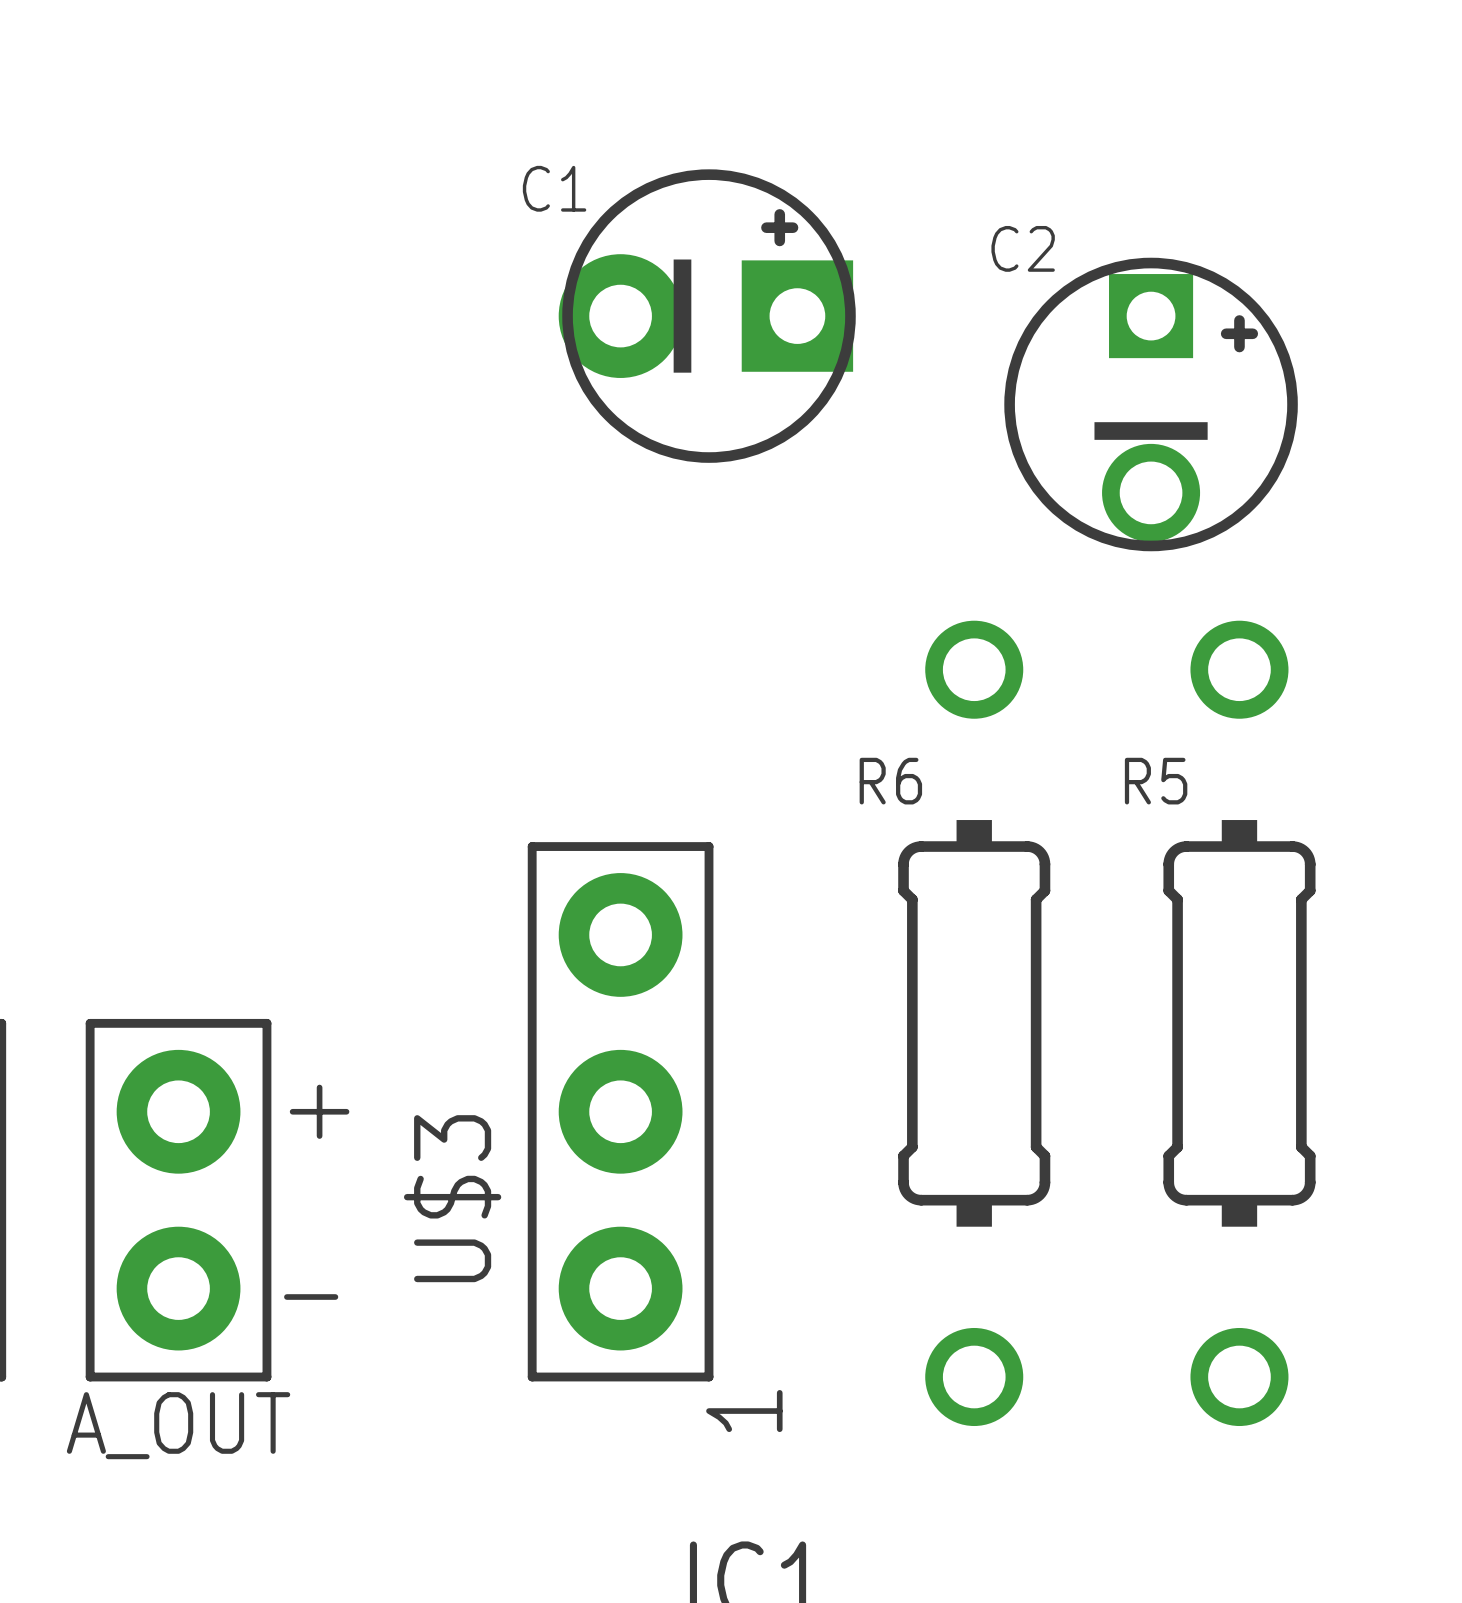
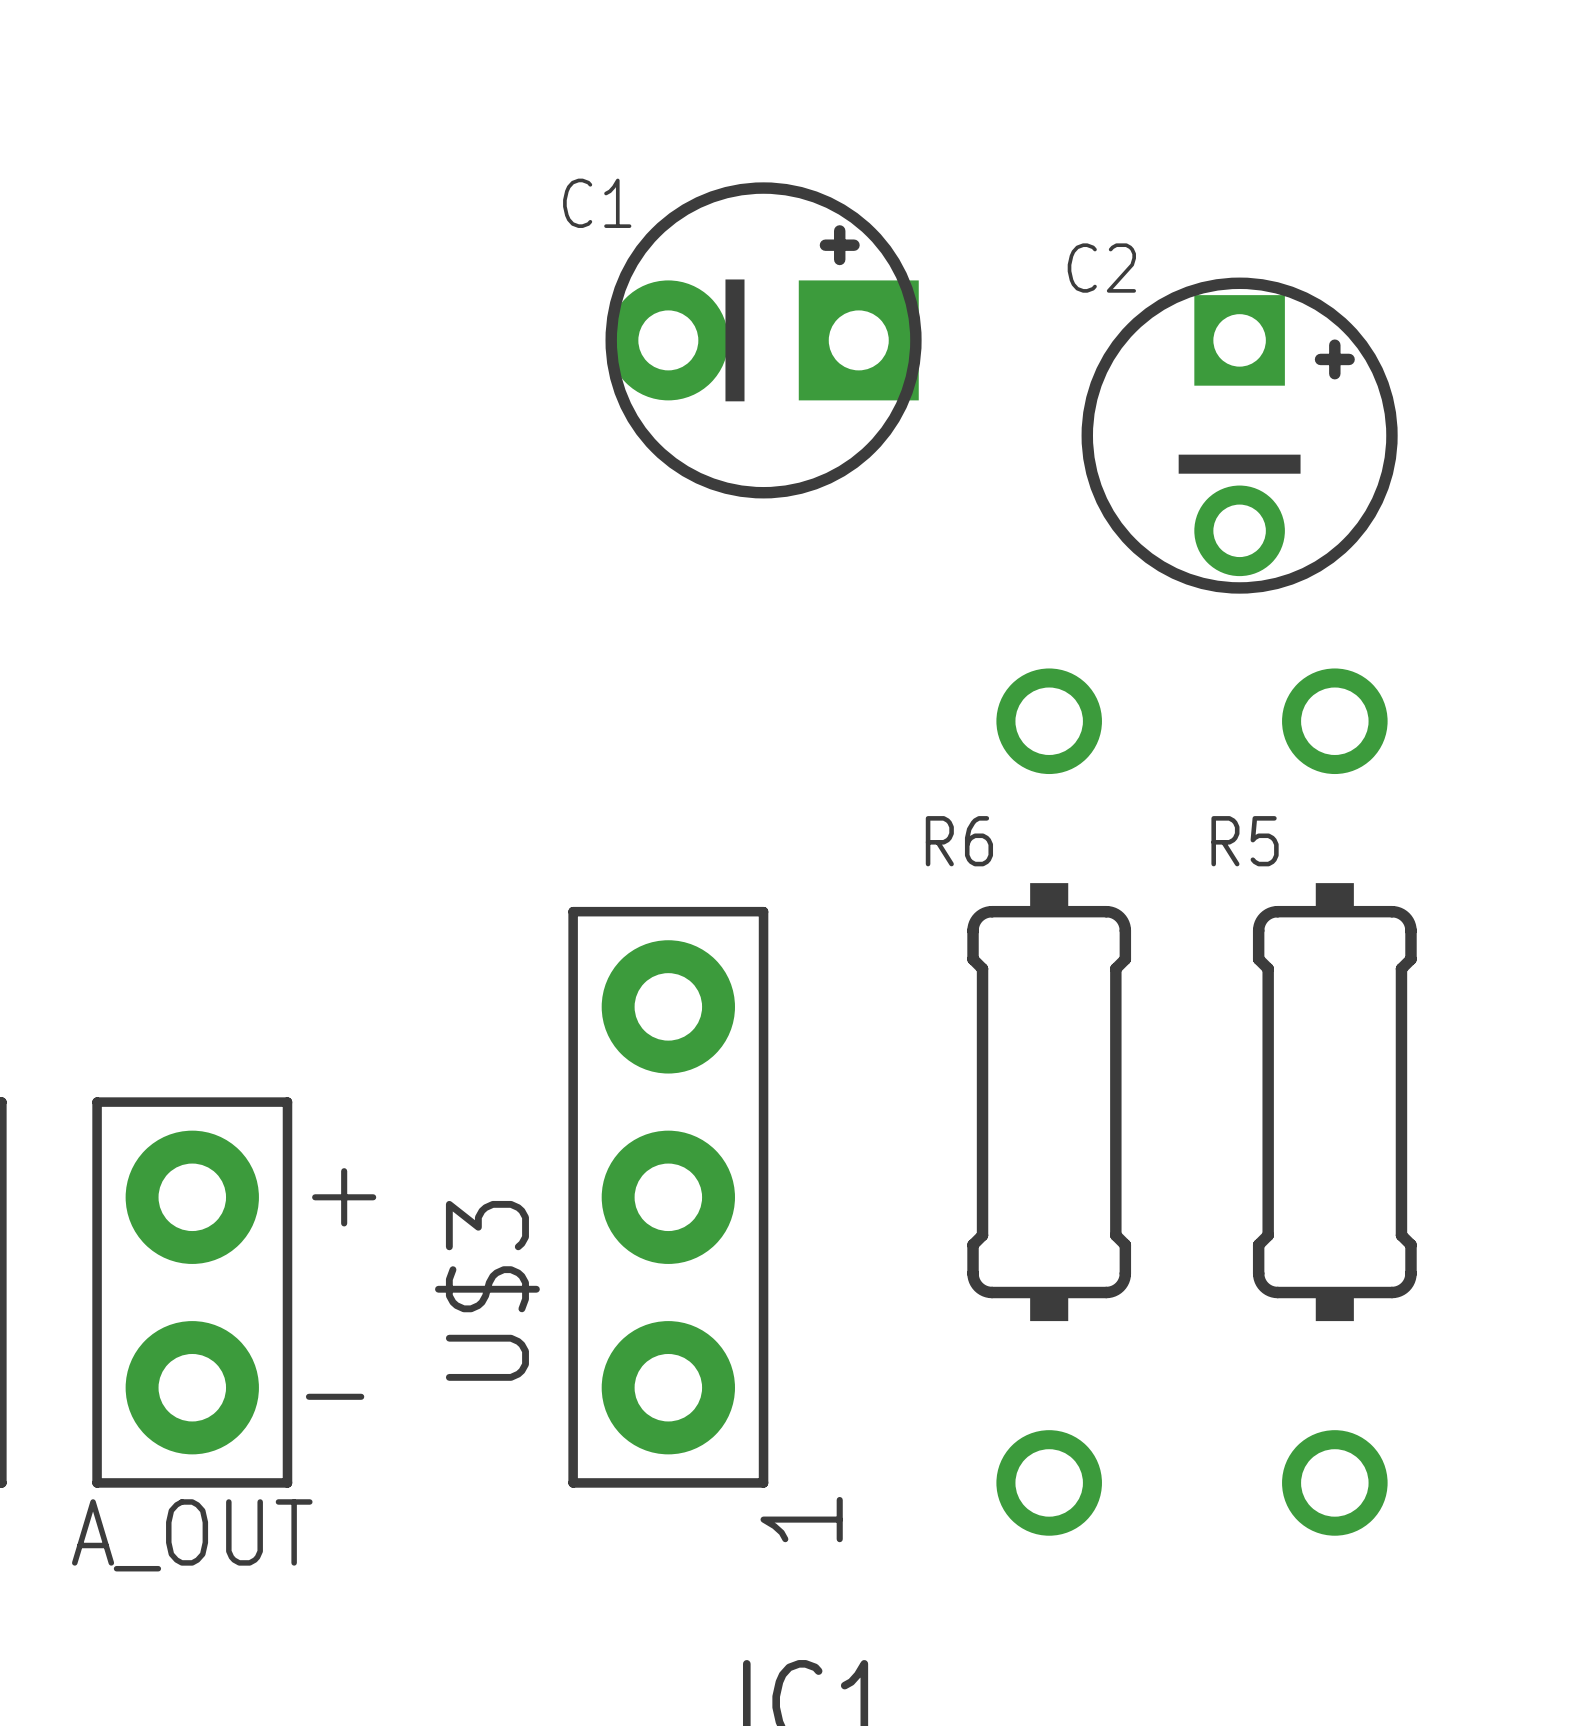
C1 footprint: [558, 169, 856, 463] -> [605, 182, 922, 499]
C2 footprint: [1004, 257, 1298, 552] -> [1081, 277, 1398, 594]

